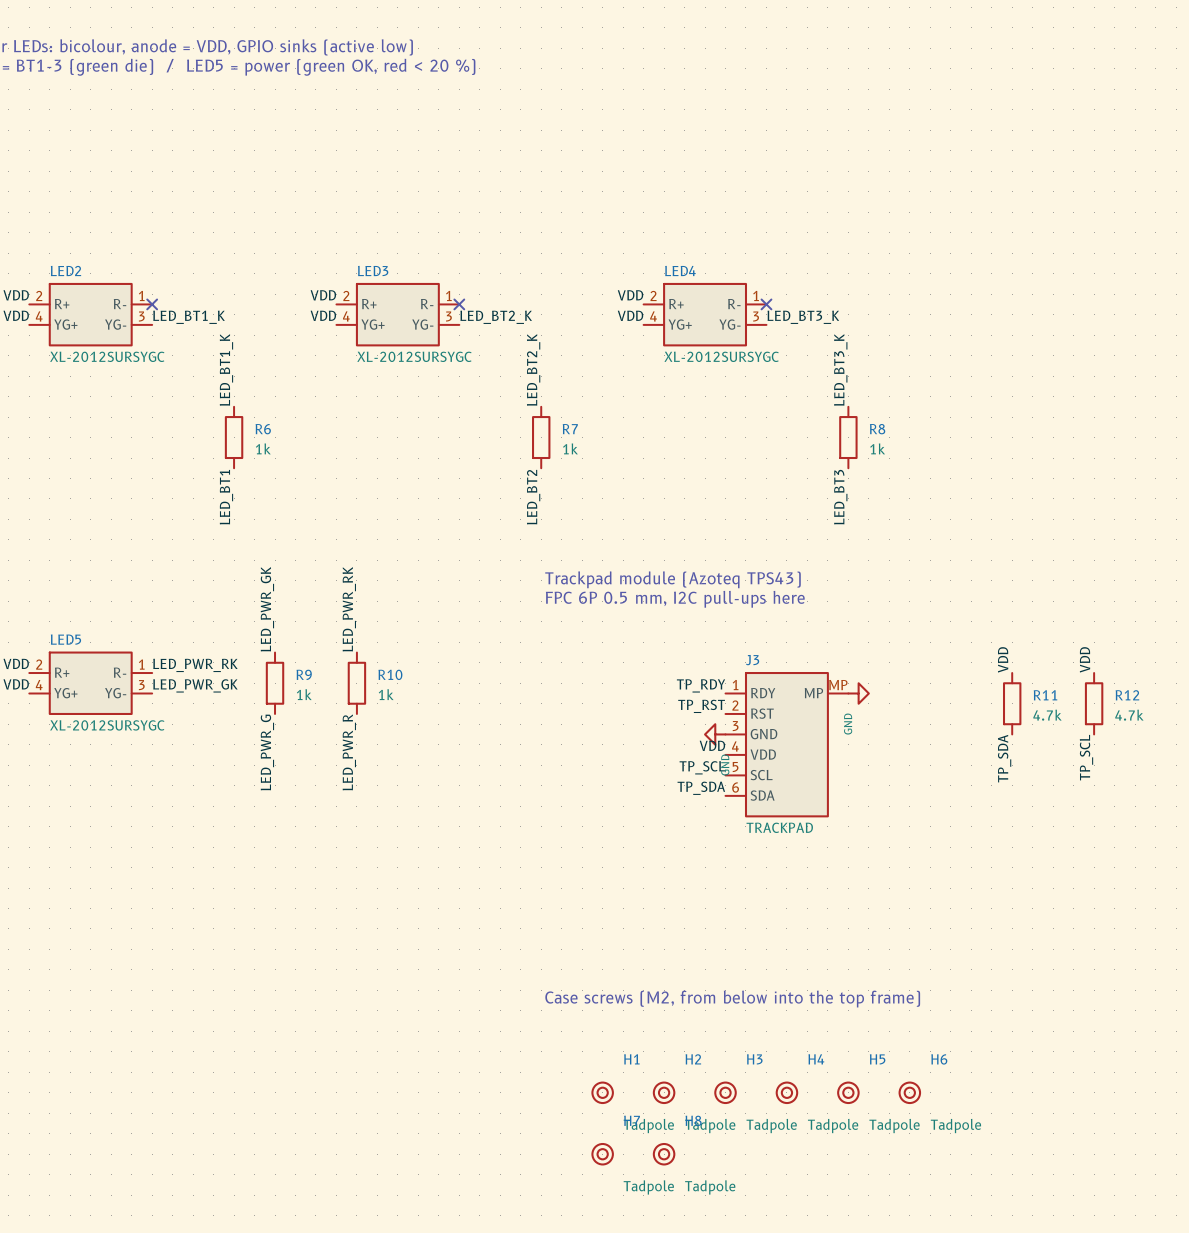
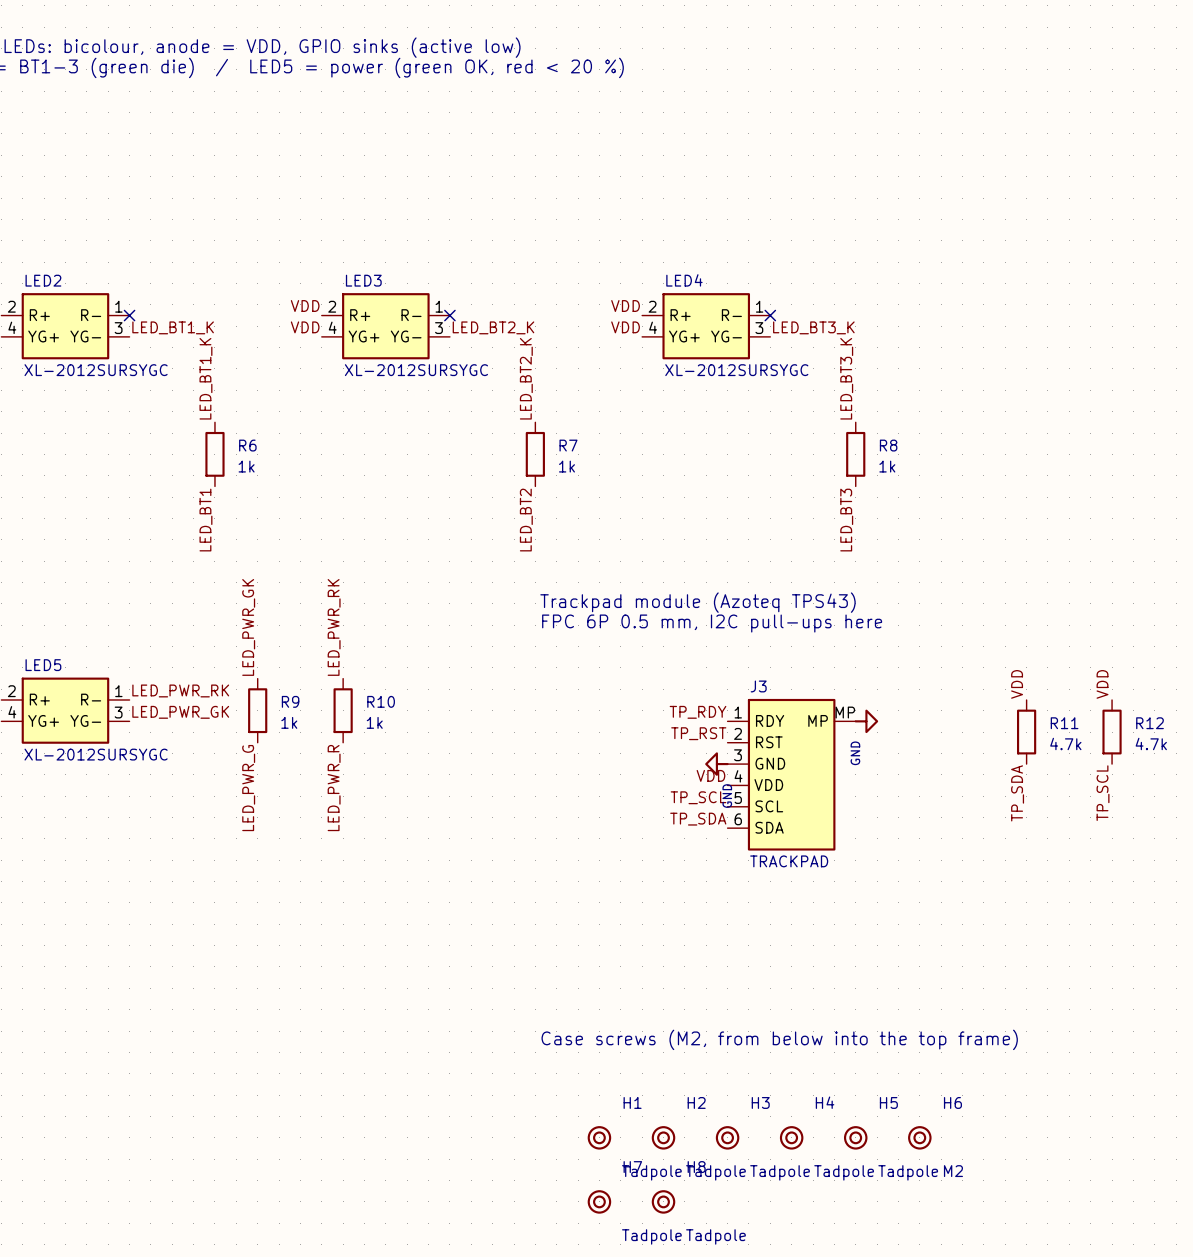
H6 value: Tadpole (955, 1126) -> M2 (953, 1171)

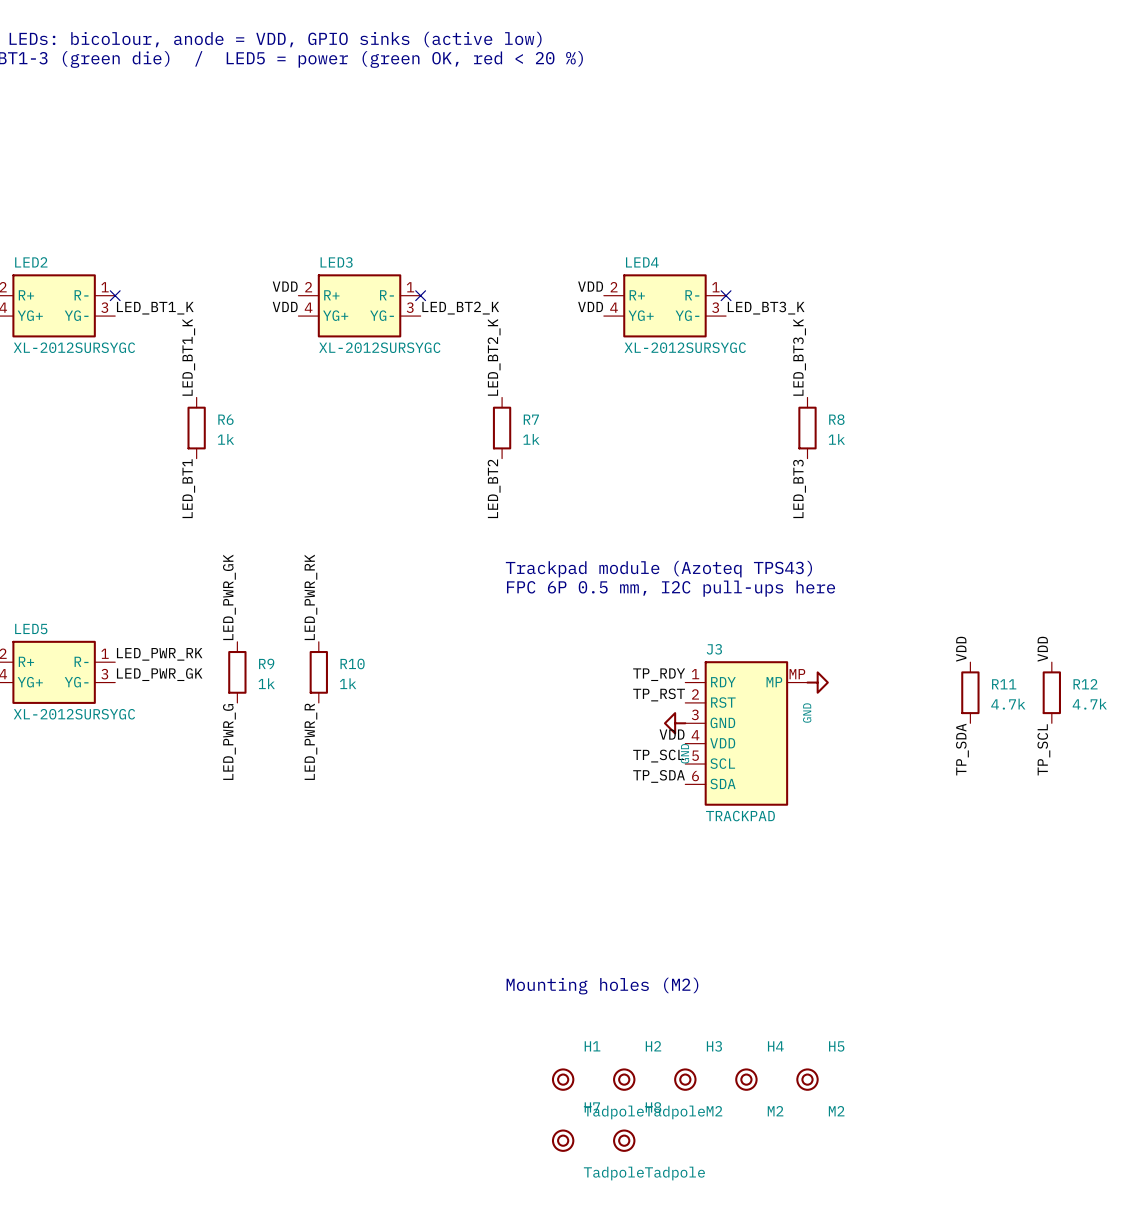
text: Case screws (M2, from below into the top frame) (779, 1039) -> Mounting holes (M2) (602, 986)
H6: M2 (919, 1137) -> none
H3 value: Tadpole (780, 1172) -> M2 (714, 1111)
H4 value: Tadpole (844, 1172) -> M2 (775, 1111)
H5 value: Tadpole (908, 1172) -> M2 (836, 1111)

